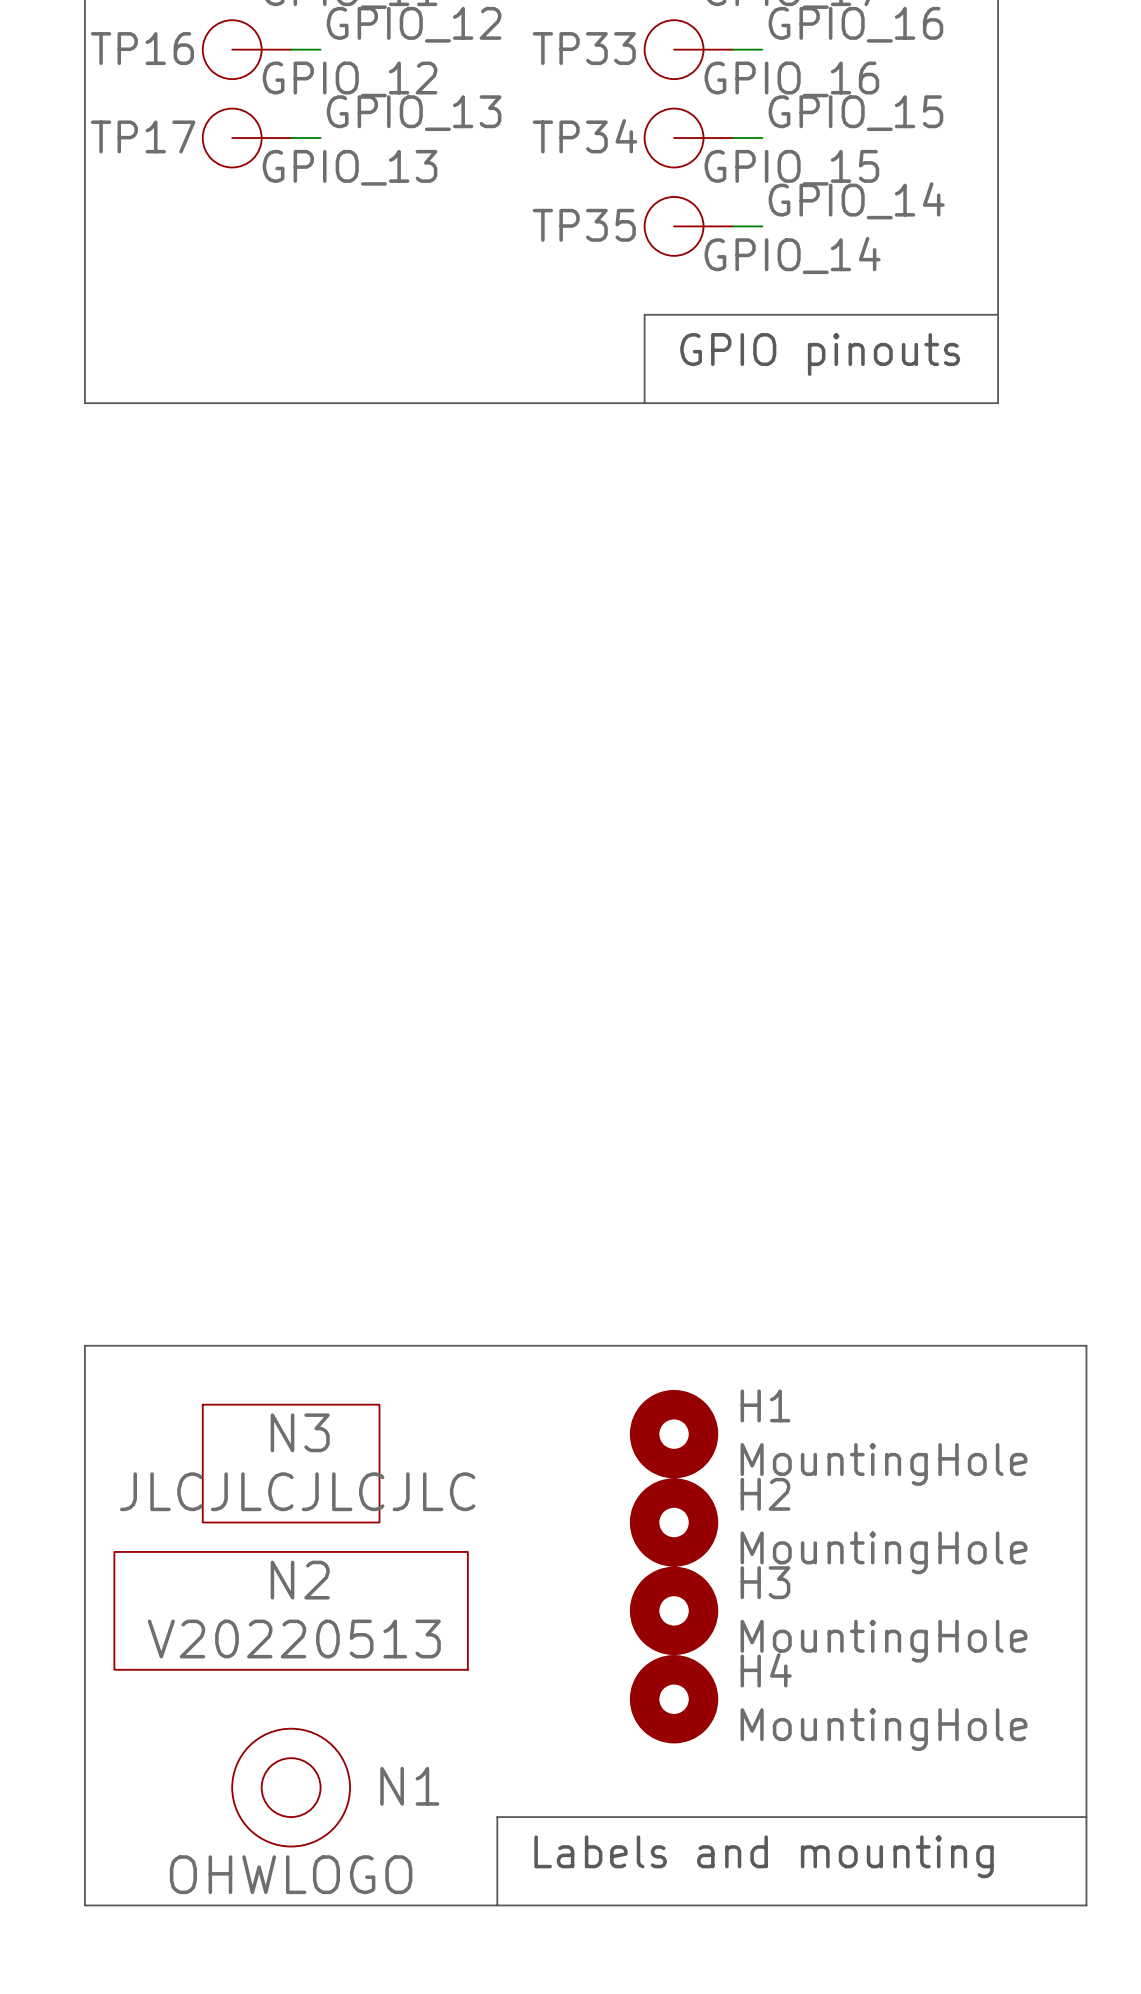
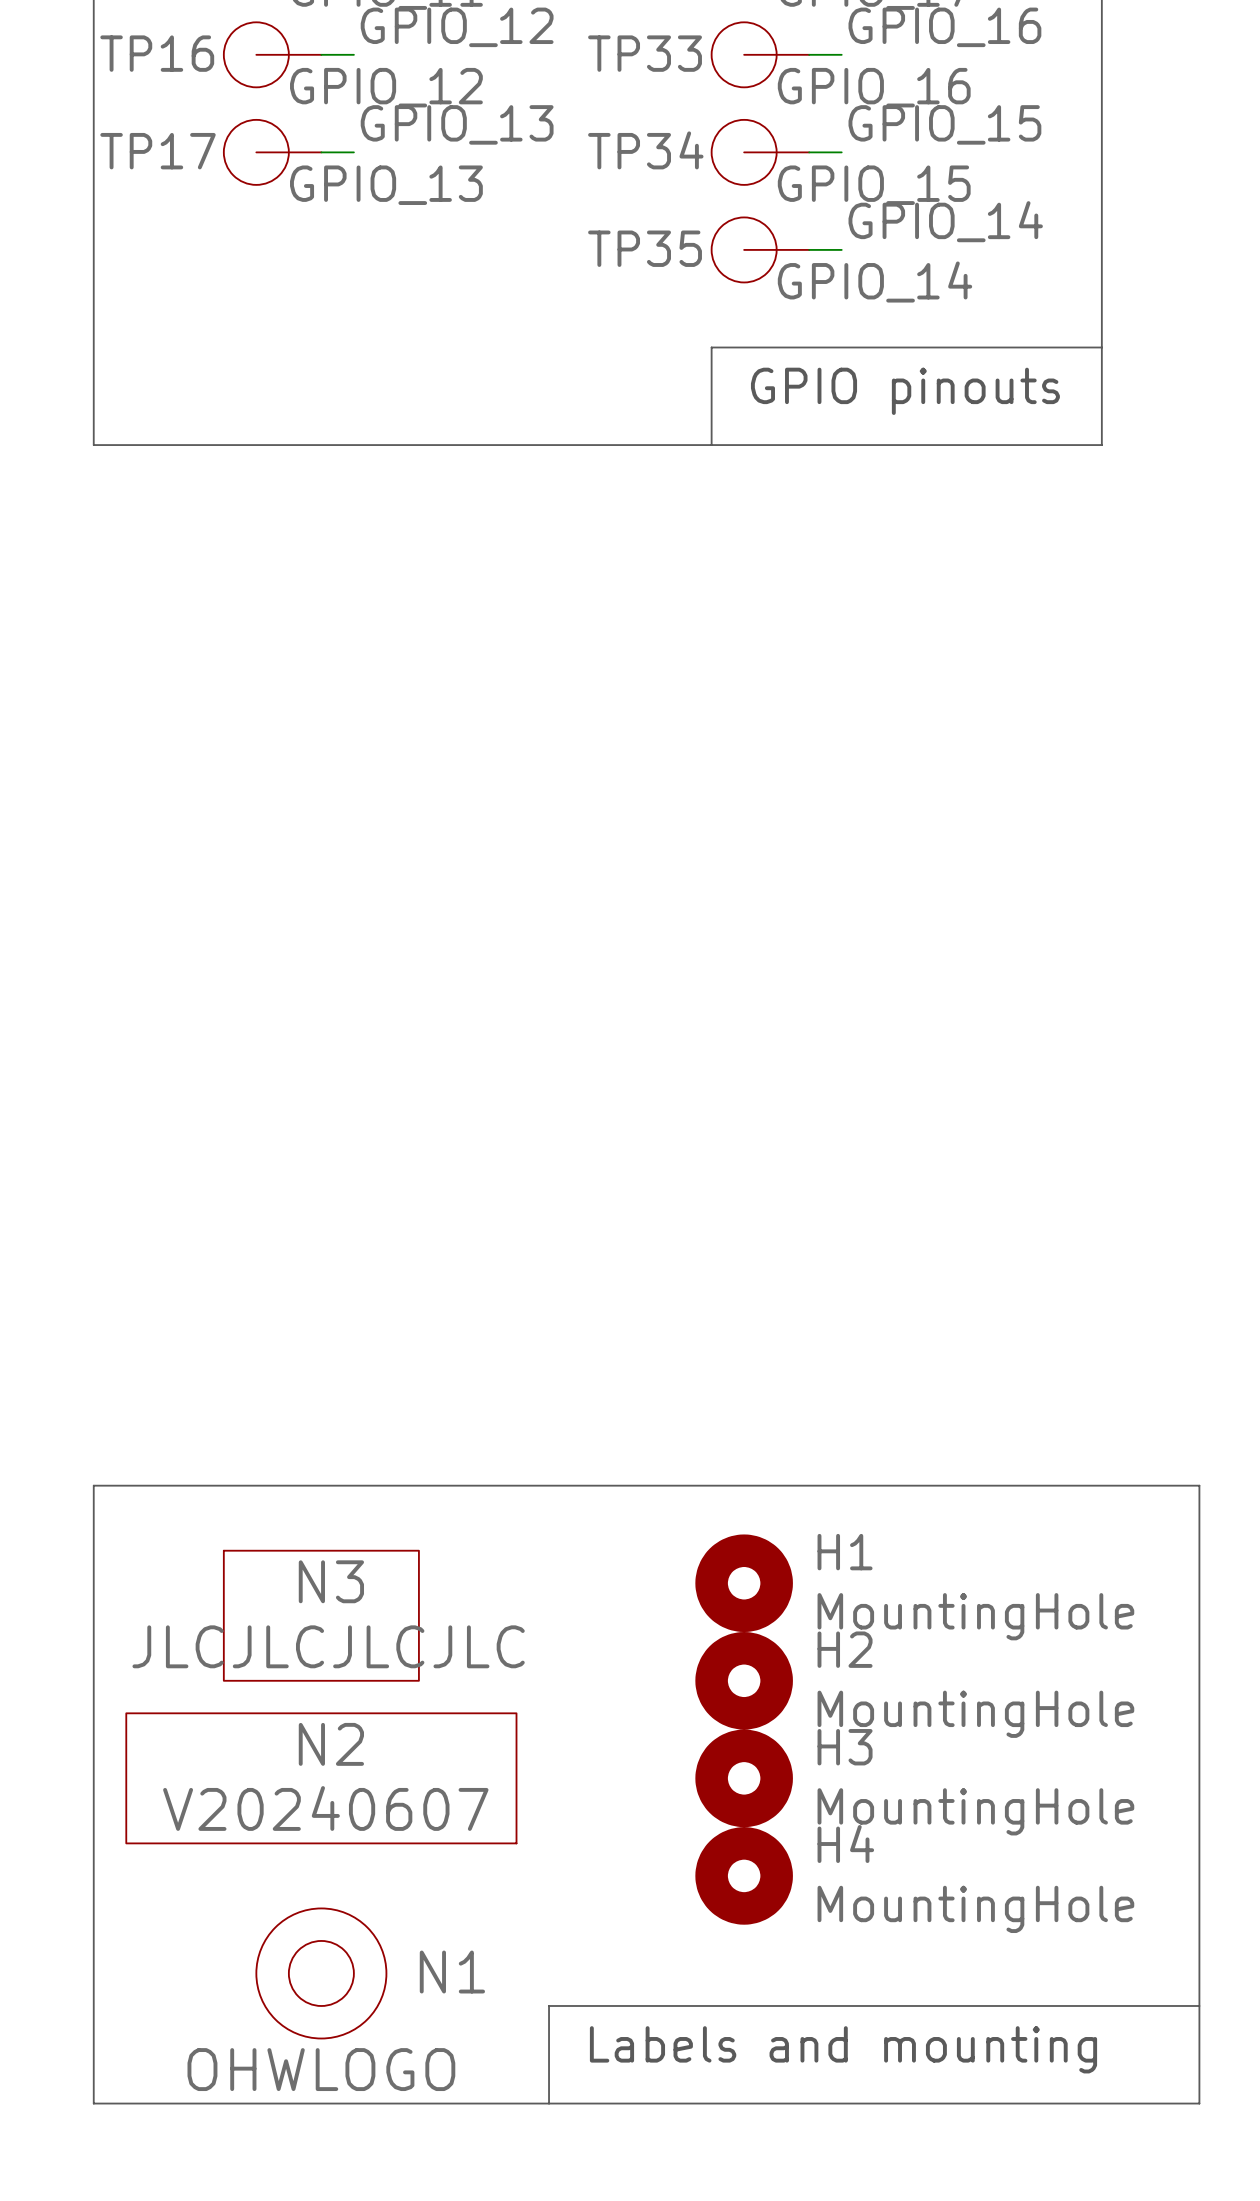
N2 value: V20220513 (294, 1639) -> V20240607 (325, 1808)

